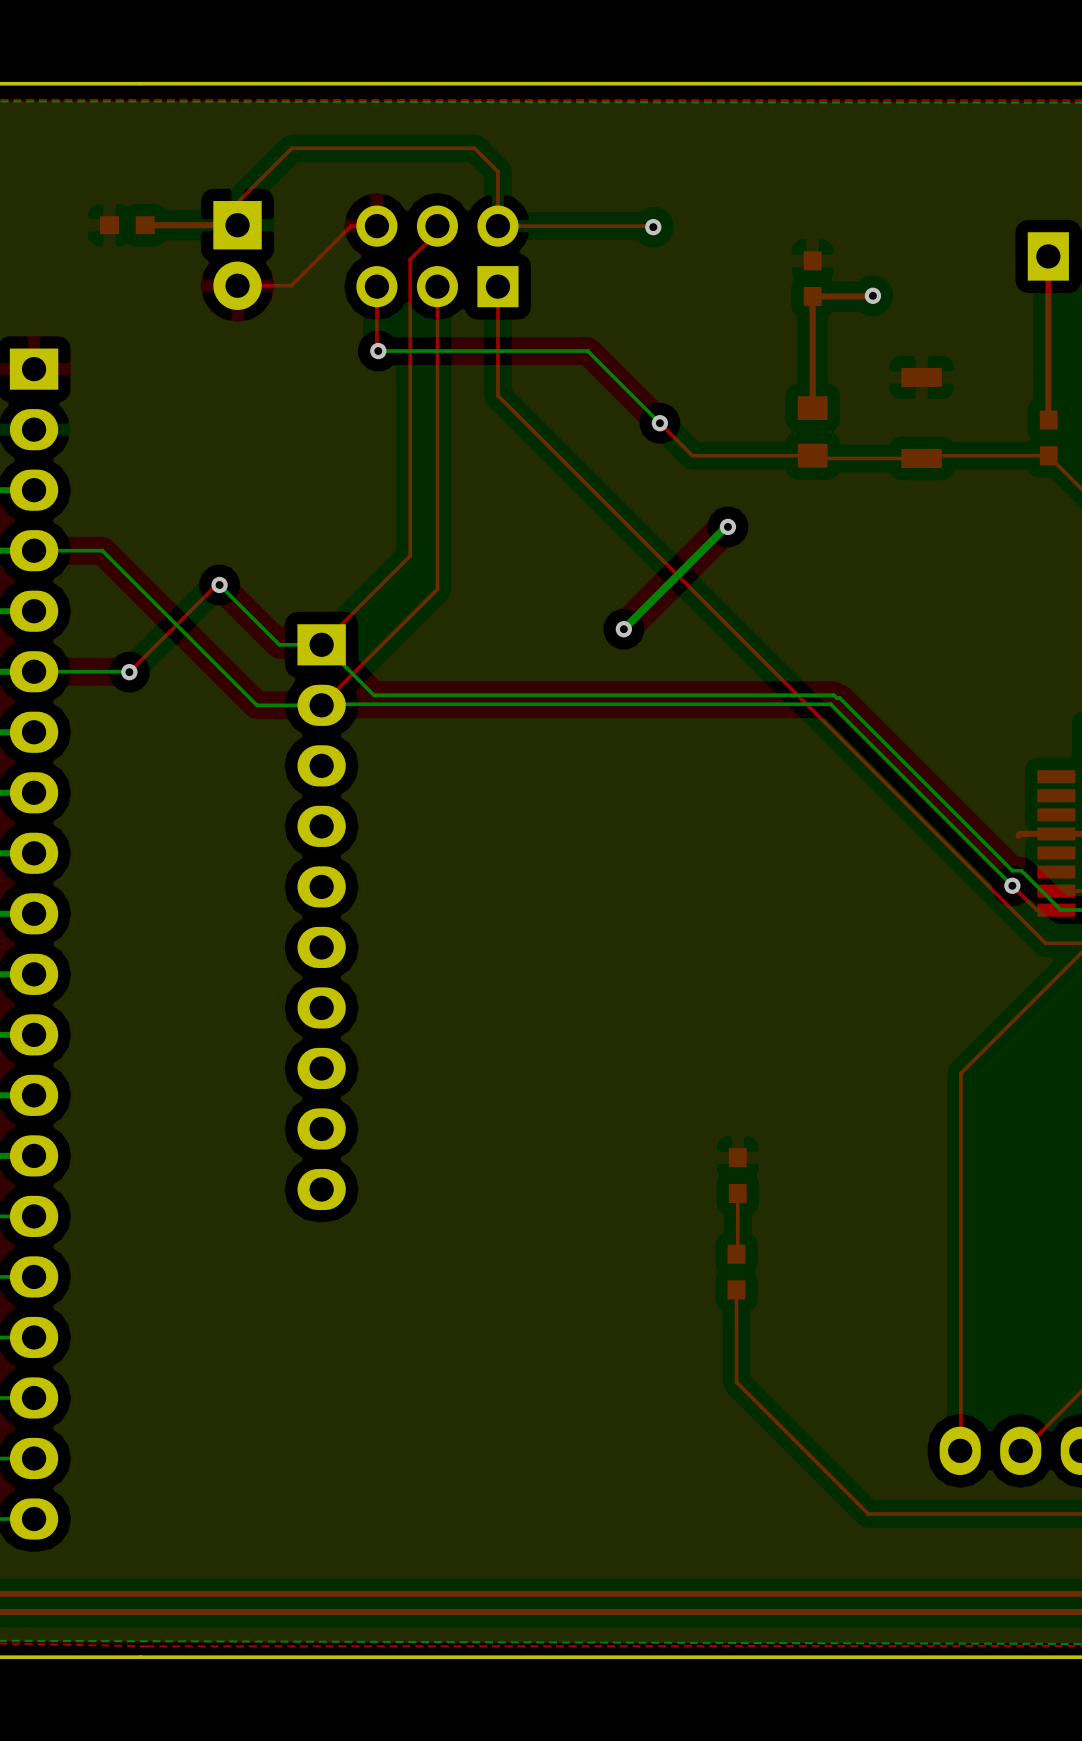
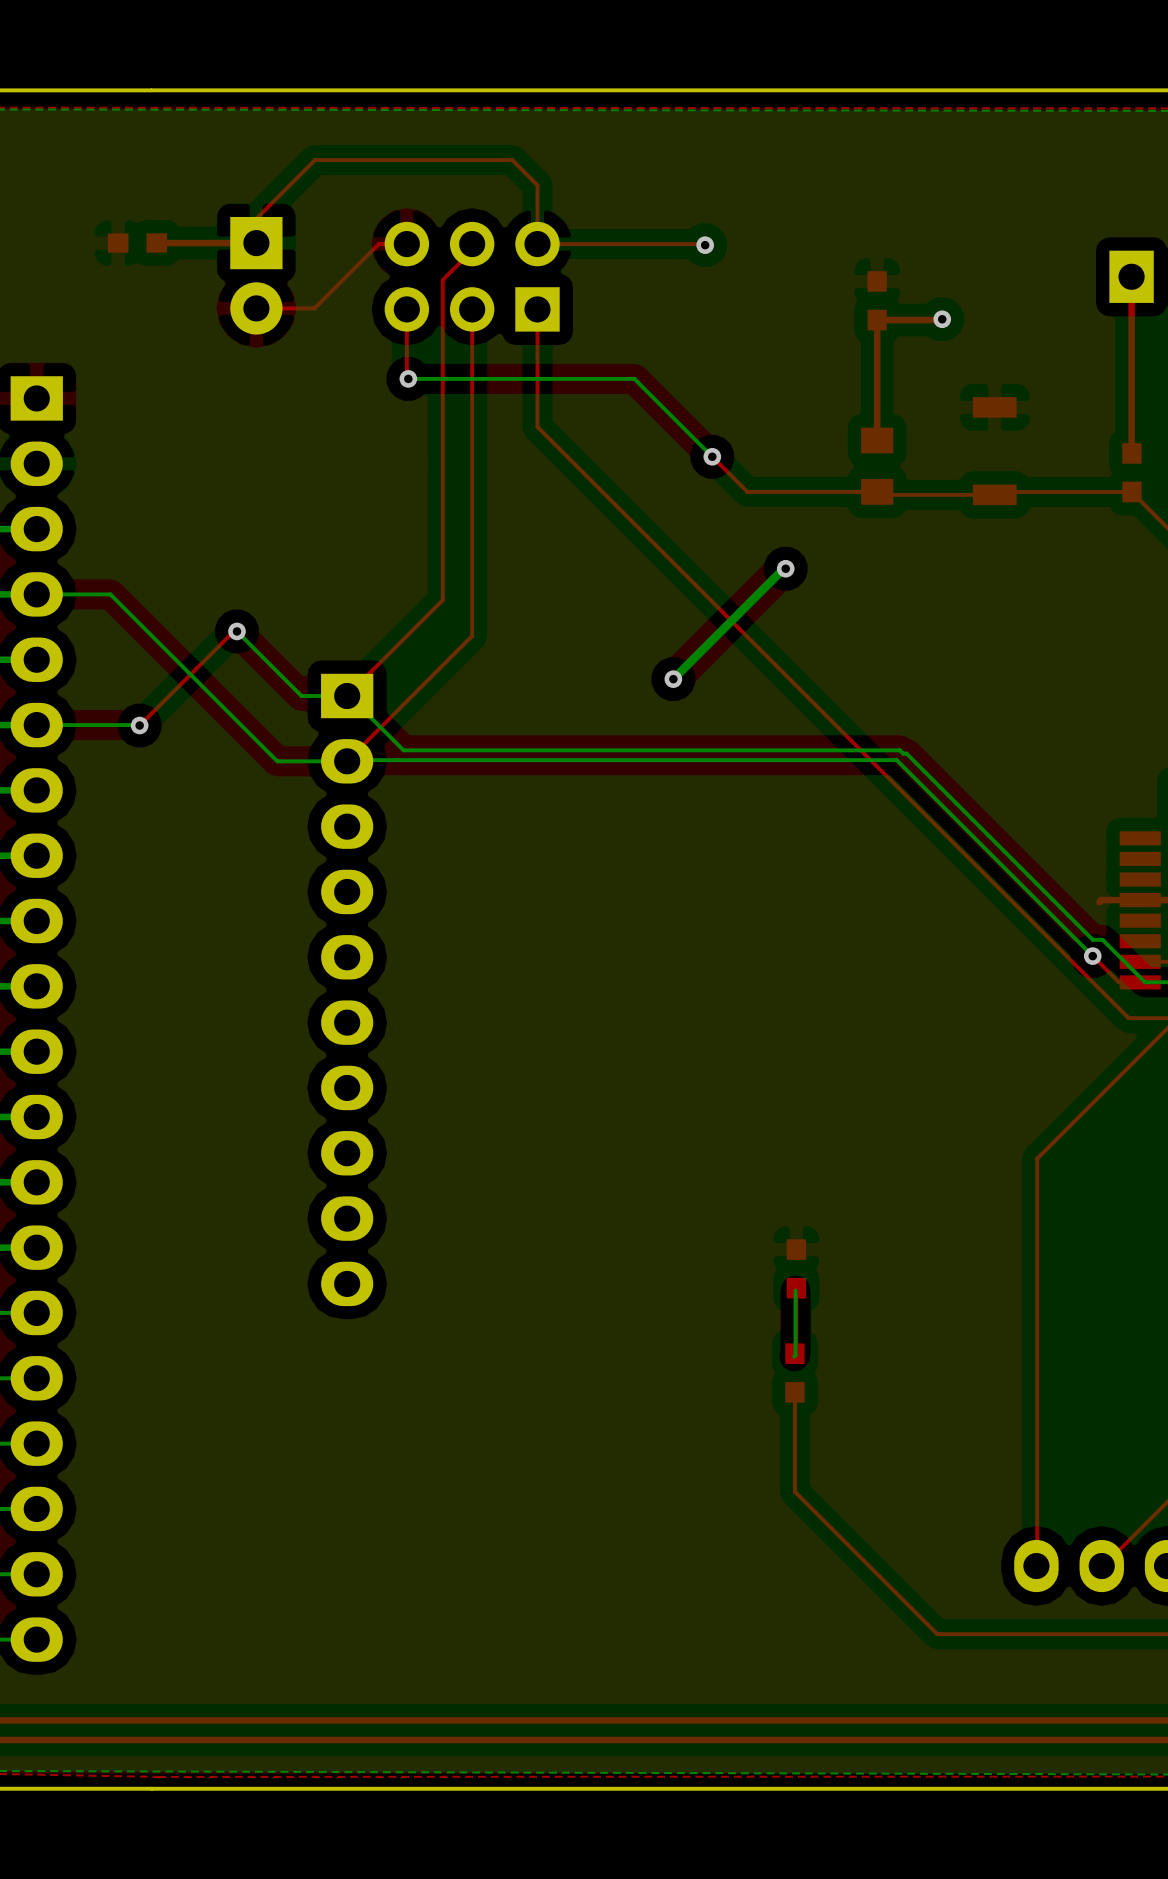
bottom track: none -> (795, 1290) (794, 1356)

